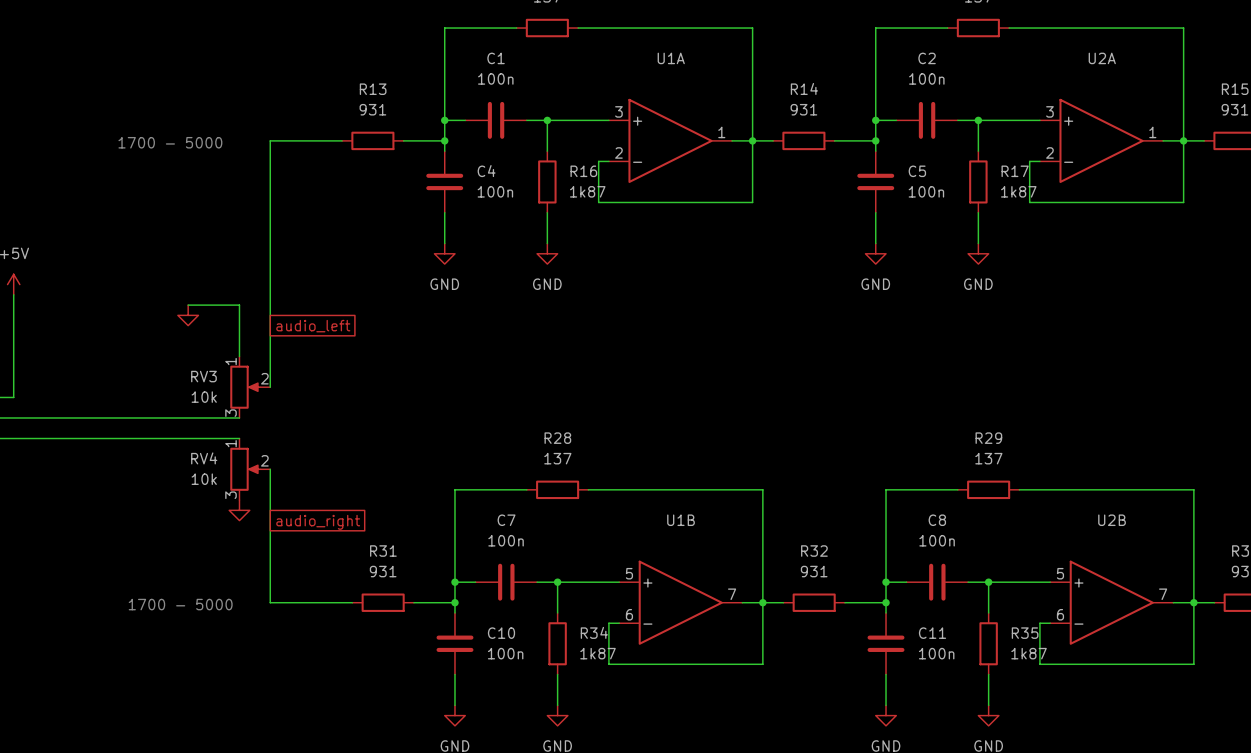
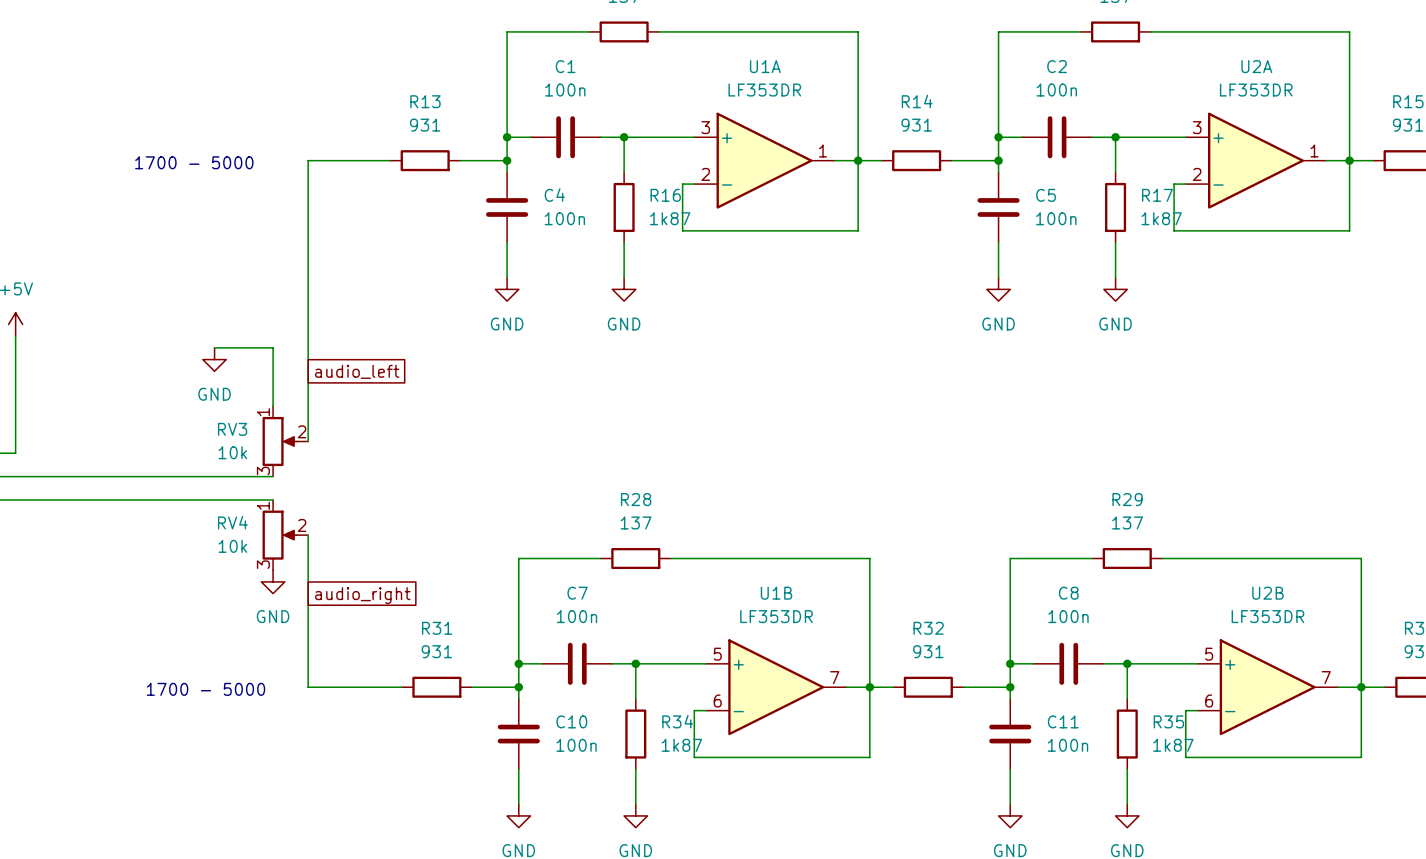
U1A value: none -> LF353DR (764, 90)
U2A value: none -> LF353DR (1256, 90)
power symbol text: none -> GND (214, 394)
power symbol text: none -> GND (273, 616)
U1B value: none -> LF353DR (776, 616)
U2B value: none -> LF353DR (1267, 616)

